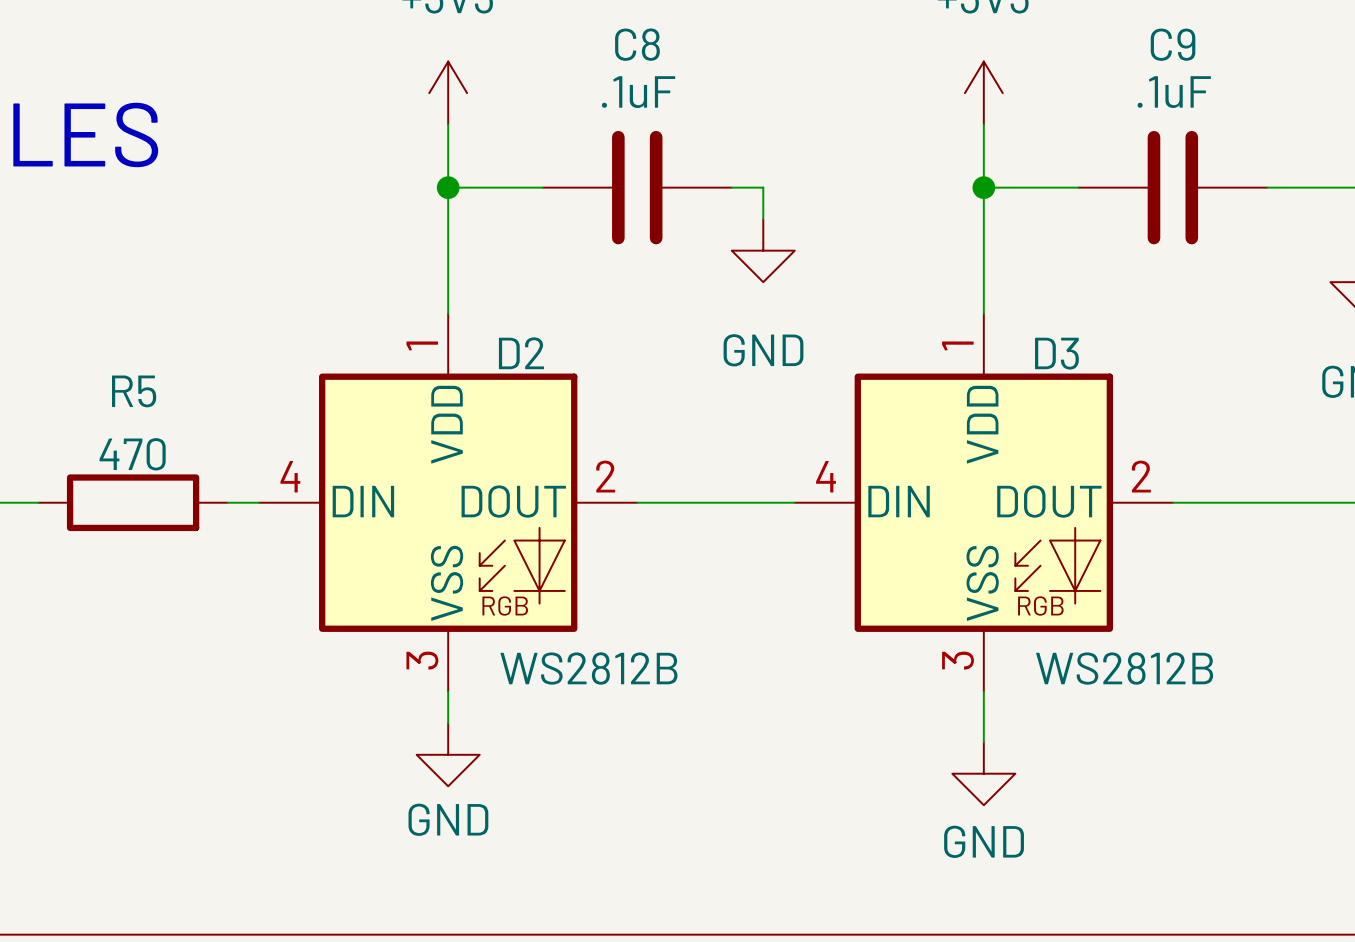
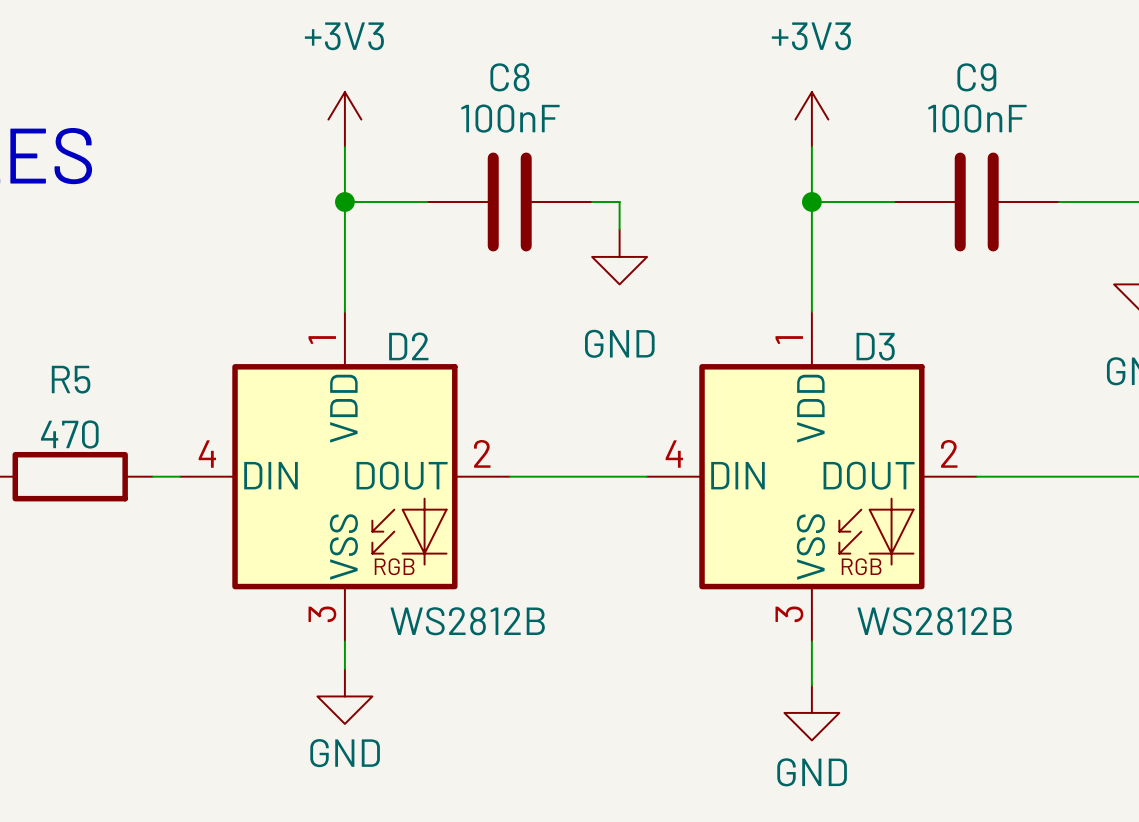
C8 value: .1uF (638, 92) -> 100nF (510, 118)
C9 value: .1uF (1174, 92) -> 100nF (977, 118)

